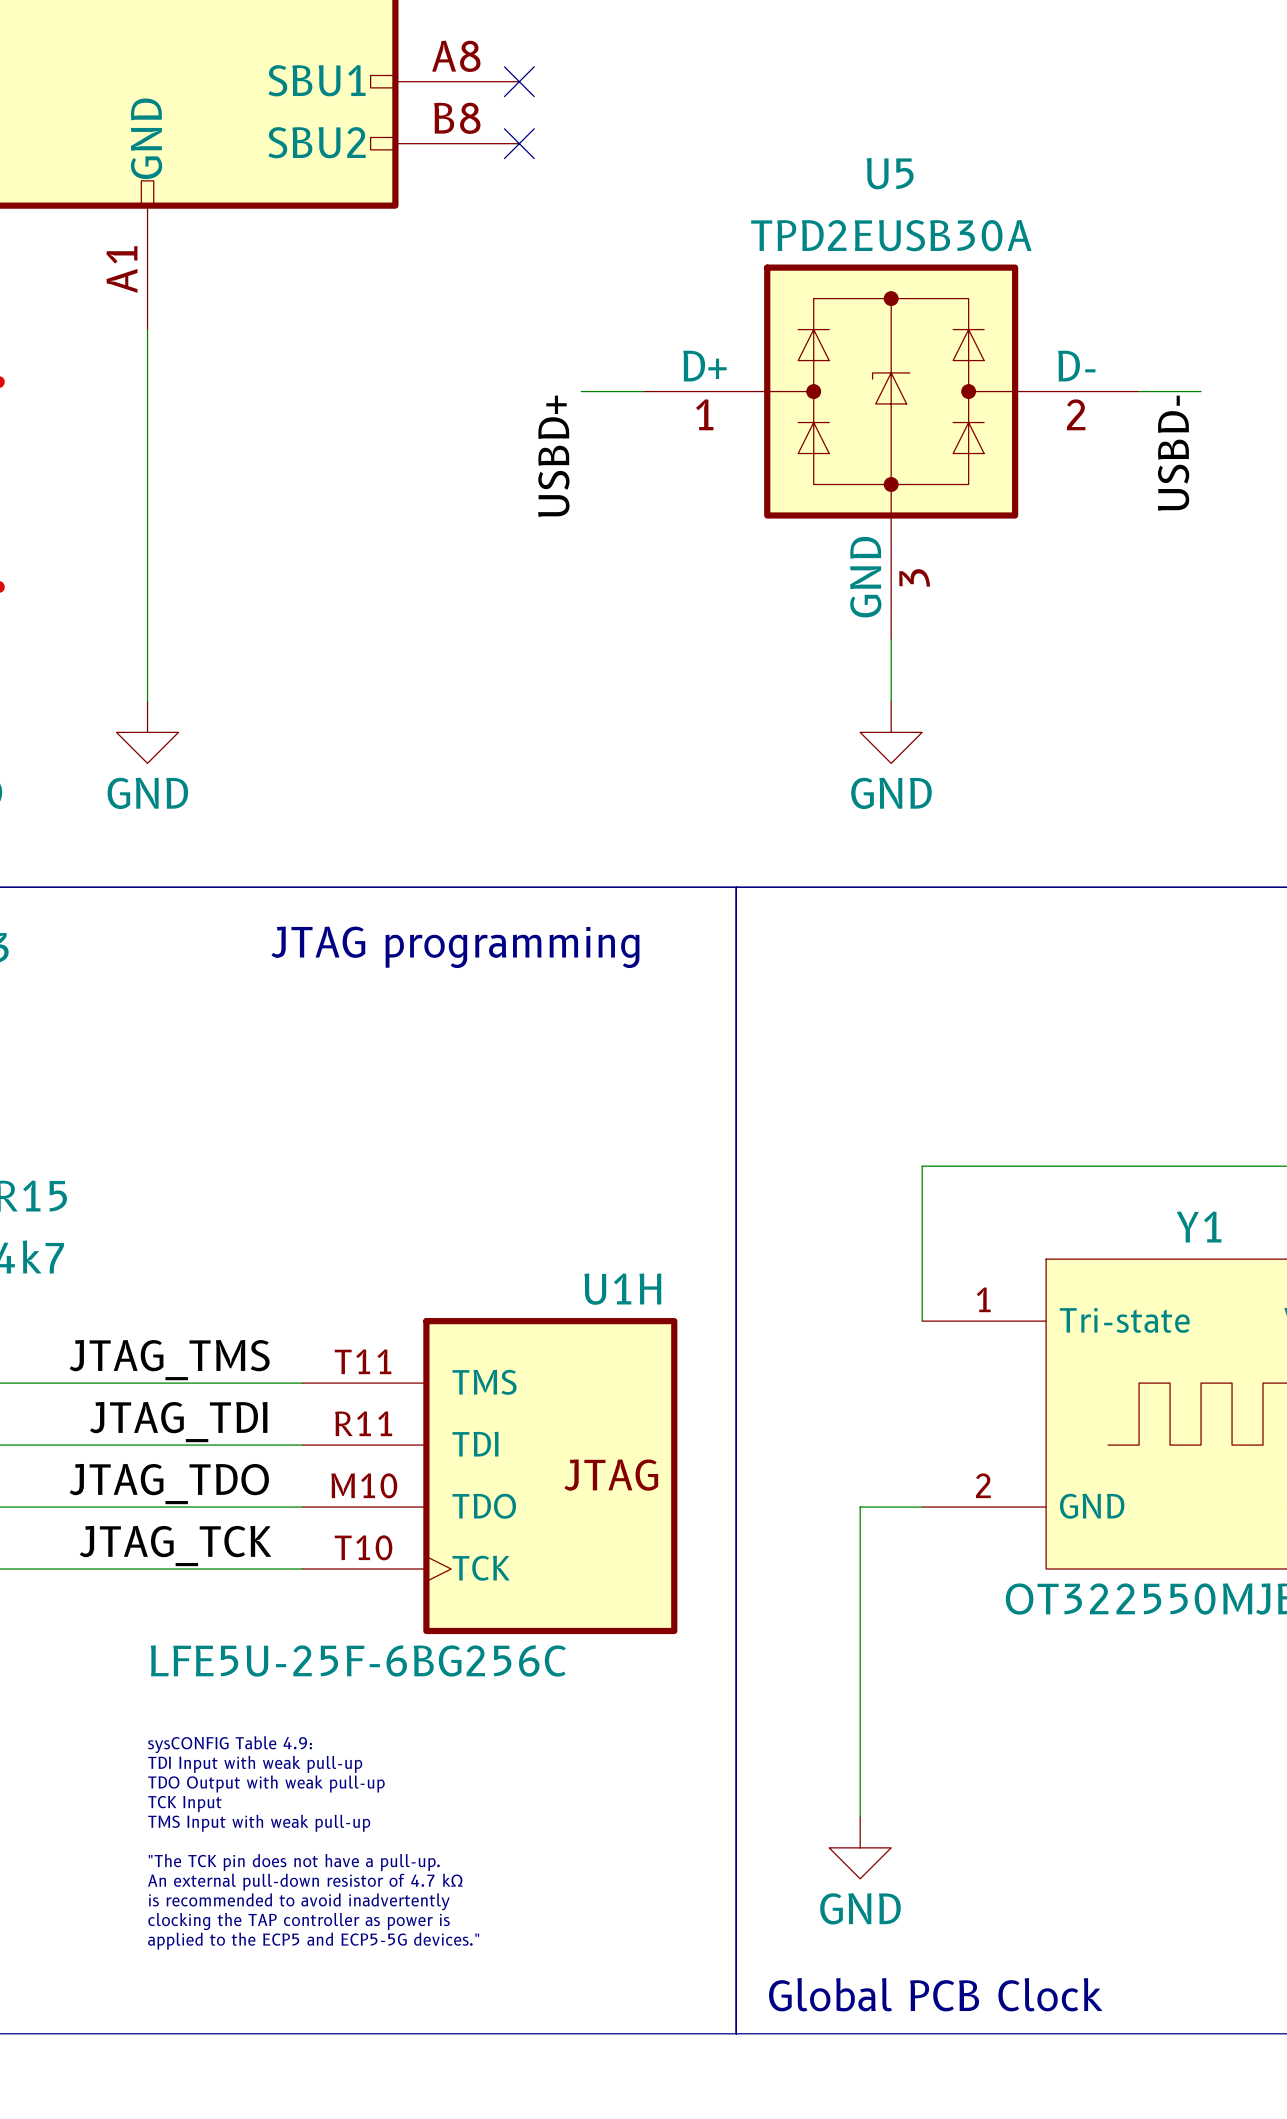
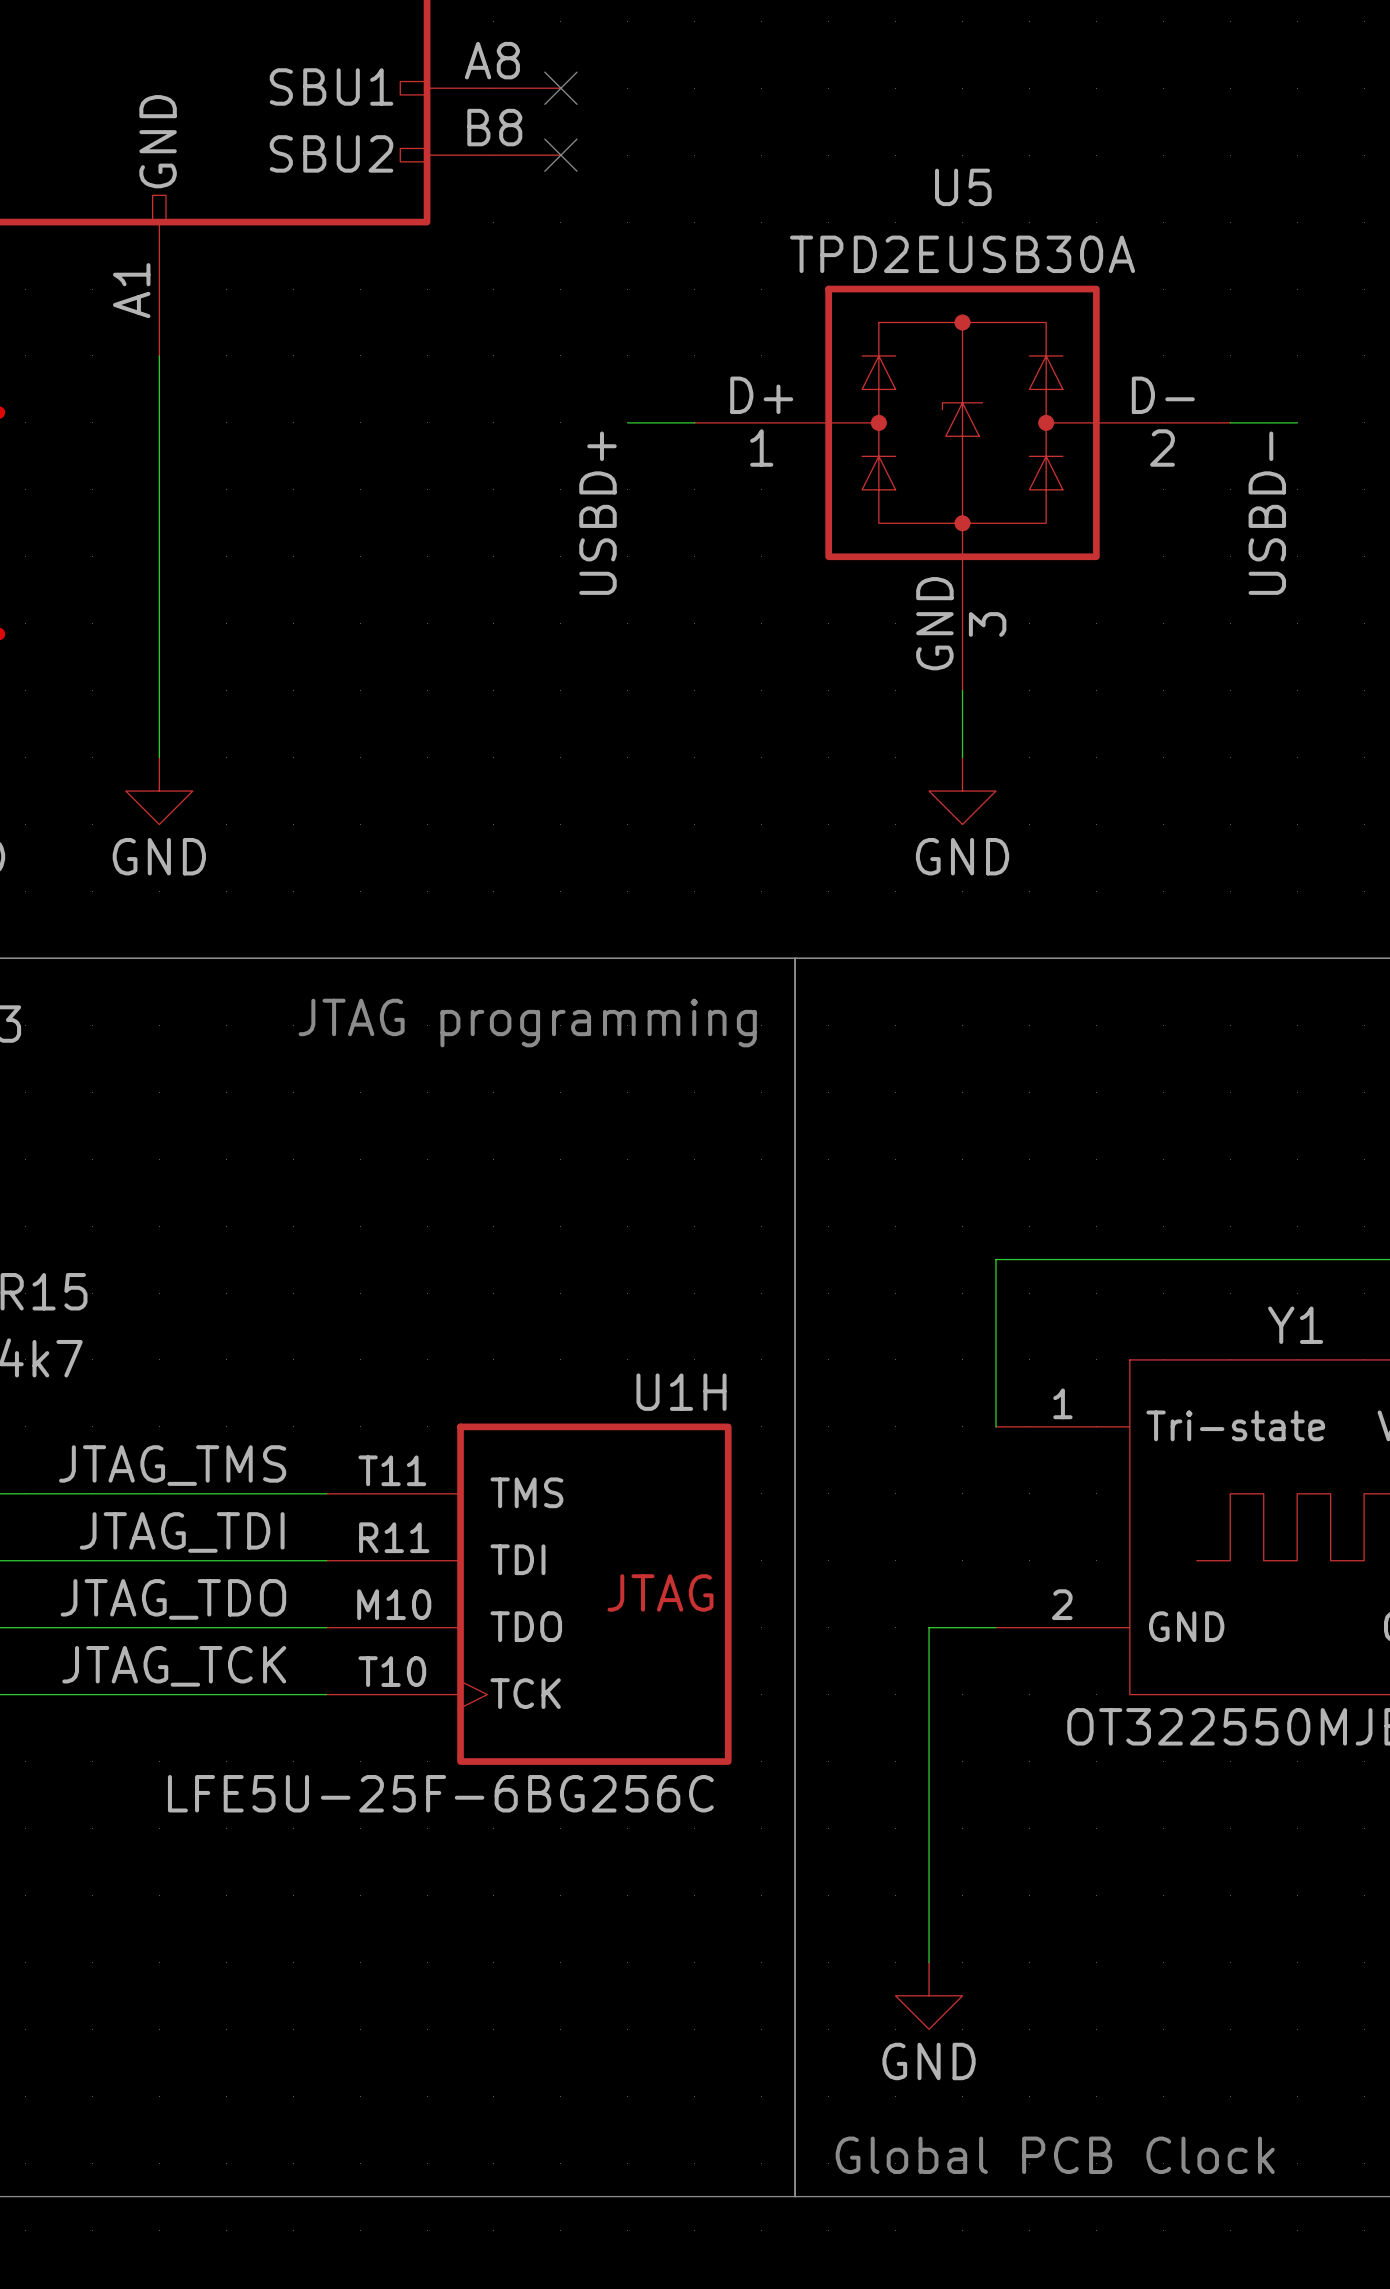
text: sysCONFIG Table 4.9: (230, 1744) -> none
text: TDI Input with weak pull-up (255, 1764) -> none
text: TDO Output with weak pull-up (266, 1784) -> none
text: TCK Input (184, 1804) -> none
text: TMS Input with weak pull-up (259, 1823) -> none
text: "The TCK pin does not have a pull-up. (294, 1862) -> none
text: An external pull-down resistor of 4.7 kΩ (305, 1882) -> none
text: is recommended to avoid inadvertently (299, 1901) -> none
text: clocking the TAP controller as power is (299, 1921) -> none
text: applied to the ECP5 and ECP5-5G devices." (313, 1941) -> none

